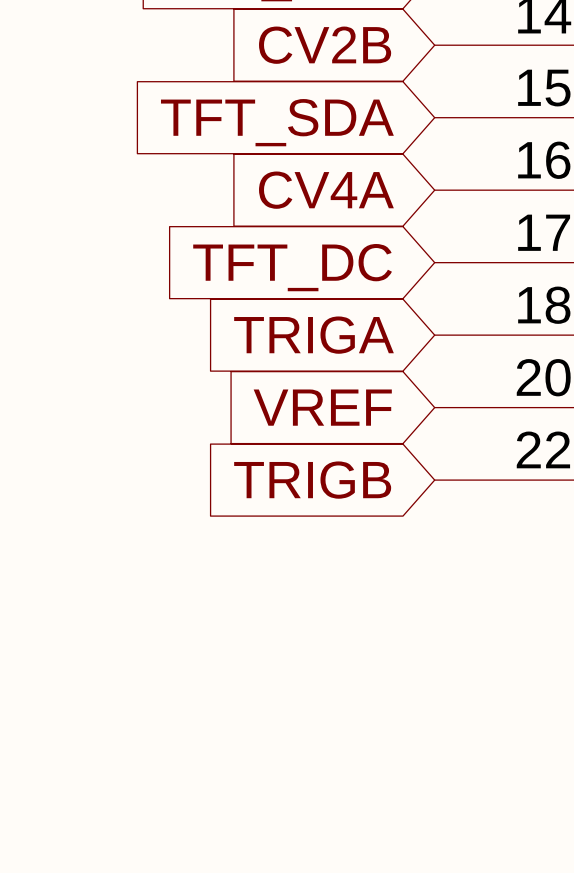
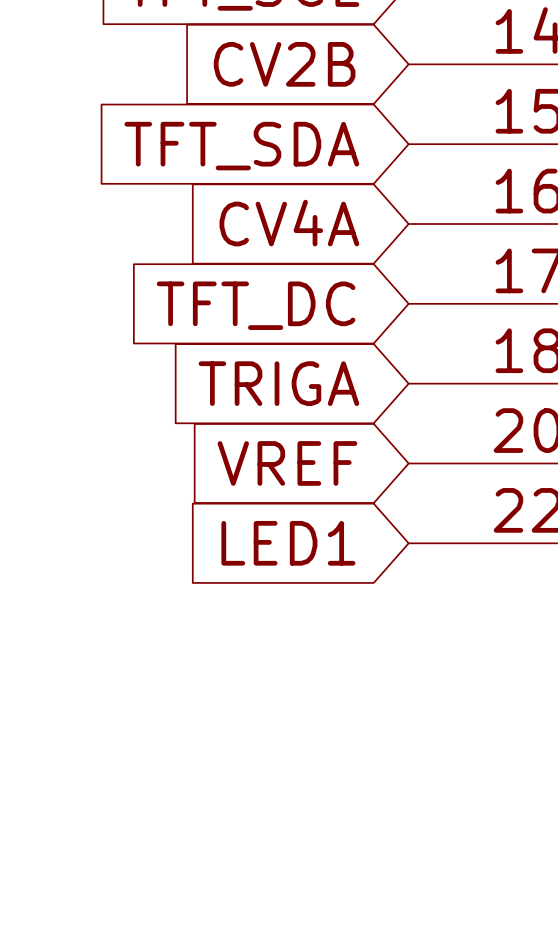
global label: TRIGB (312, 480) -> LED1 (288, 543)

